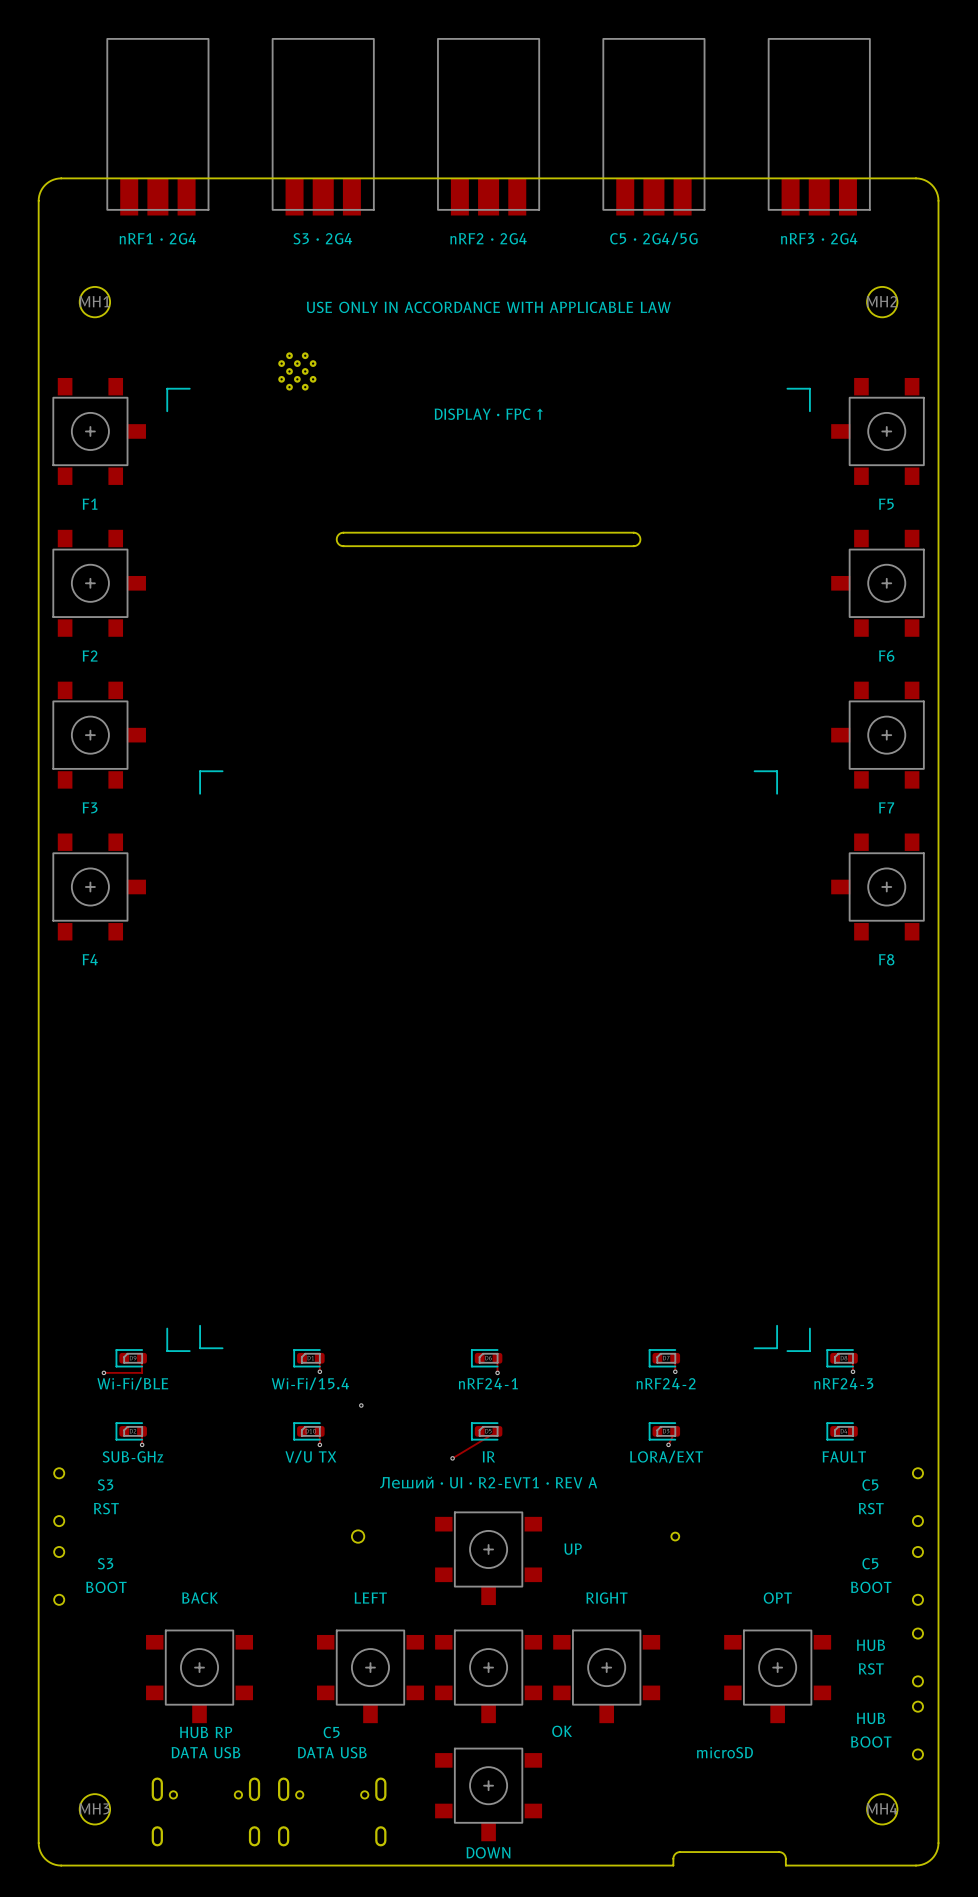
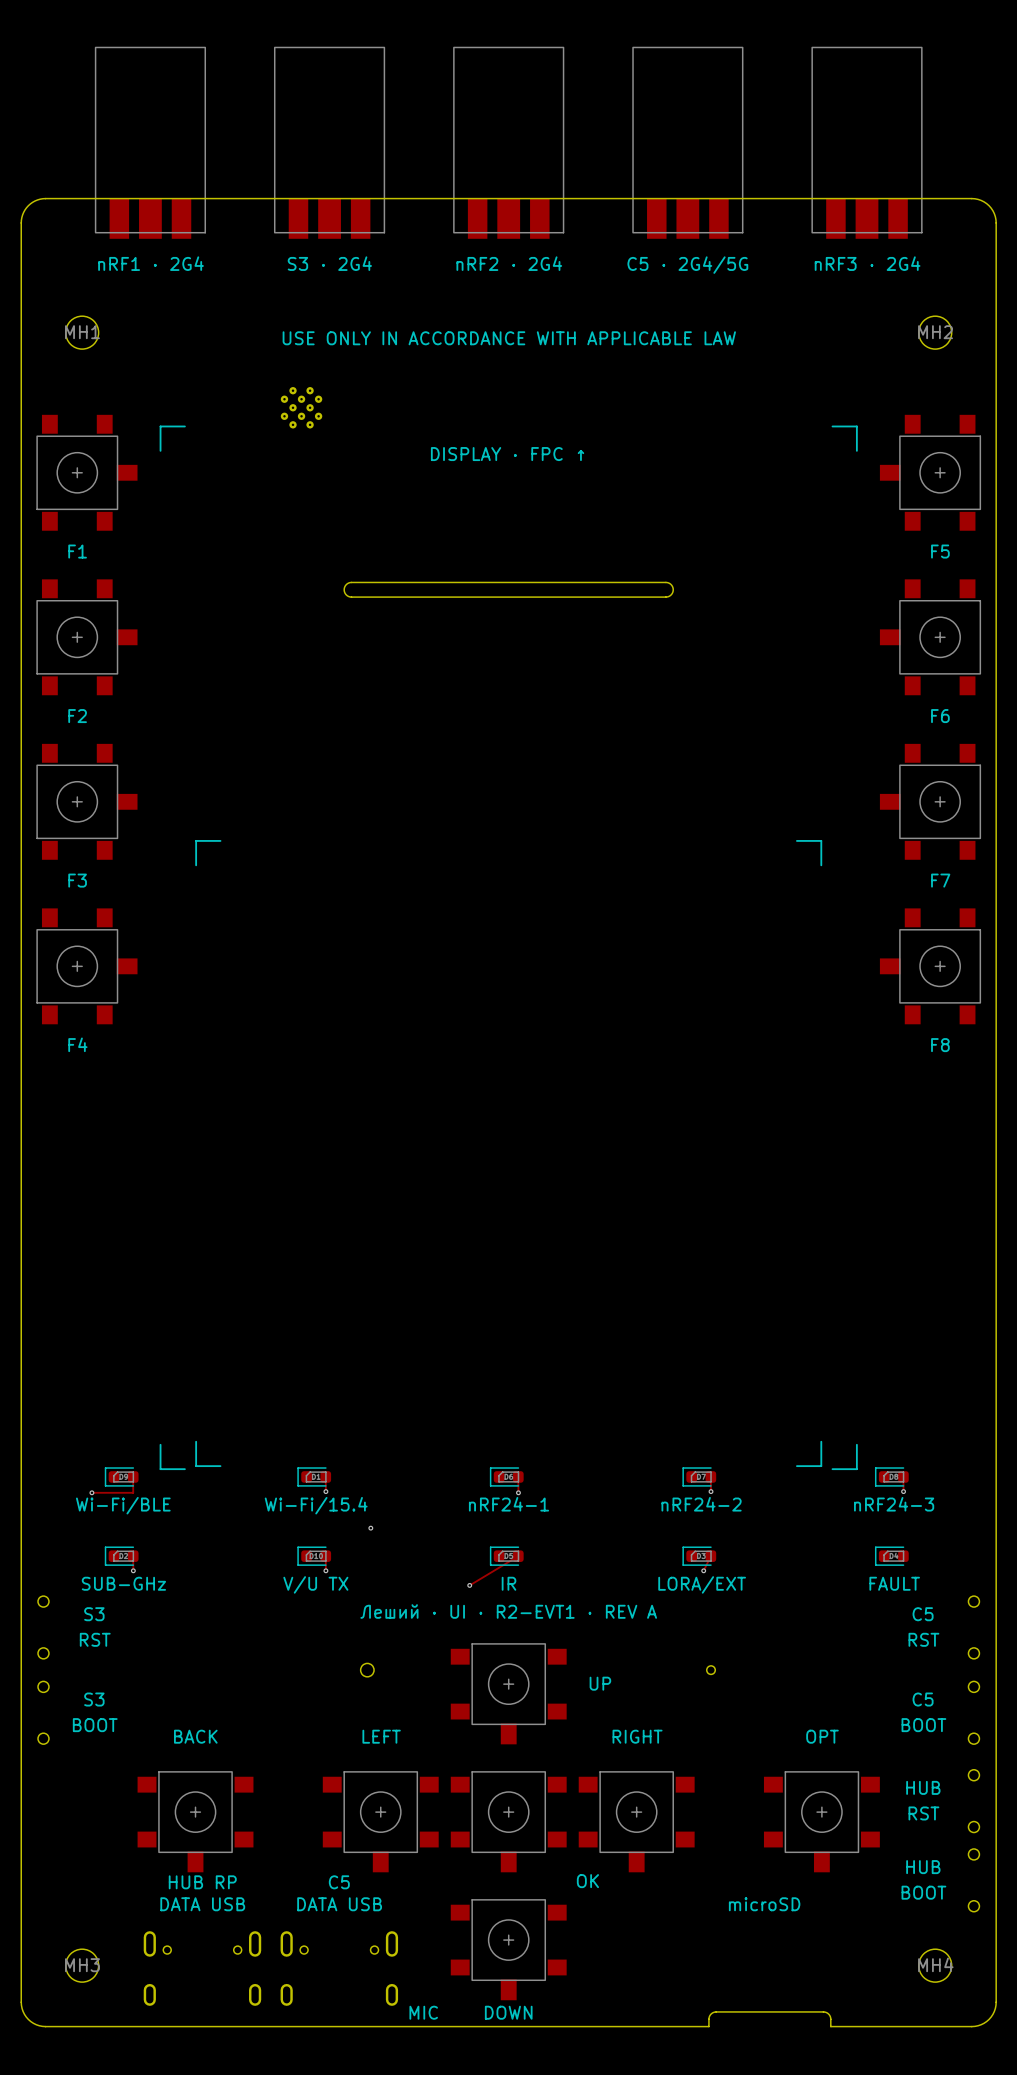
text: none -> MIC (423, 2012)

